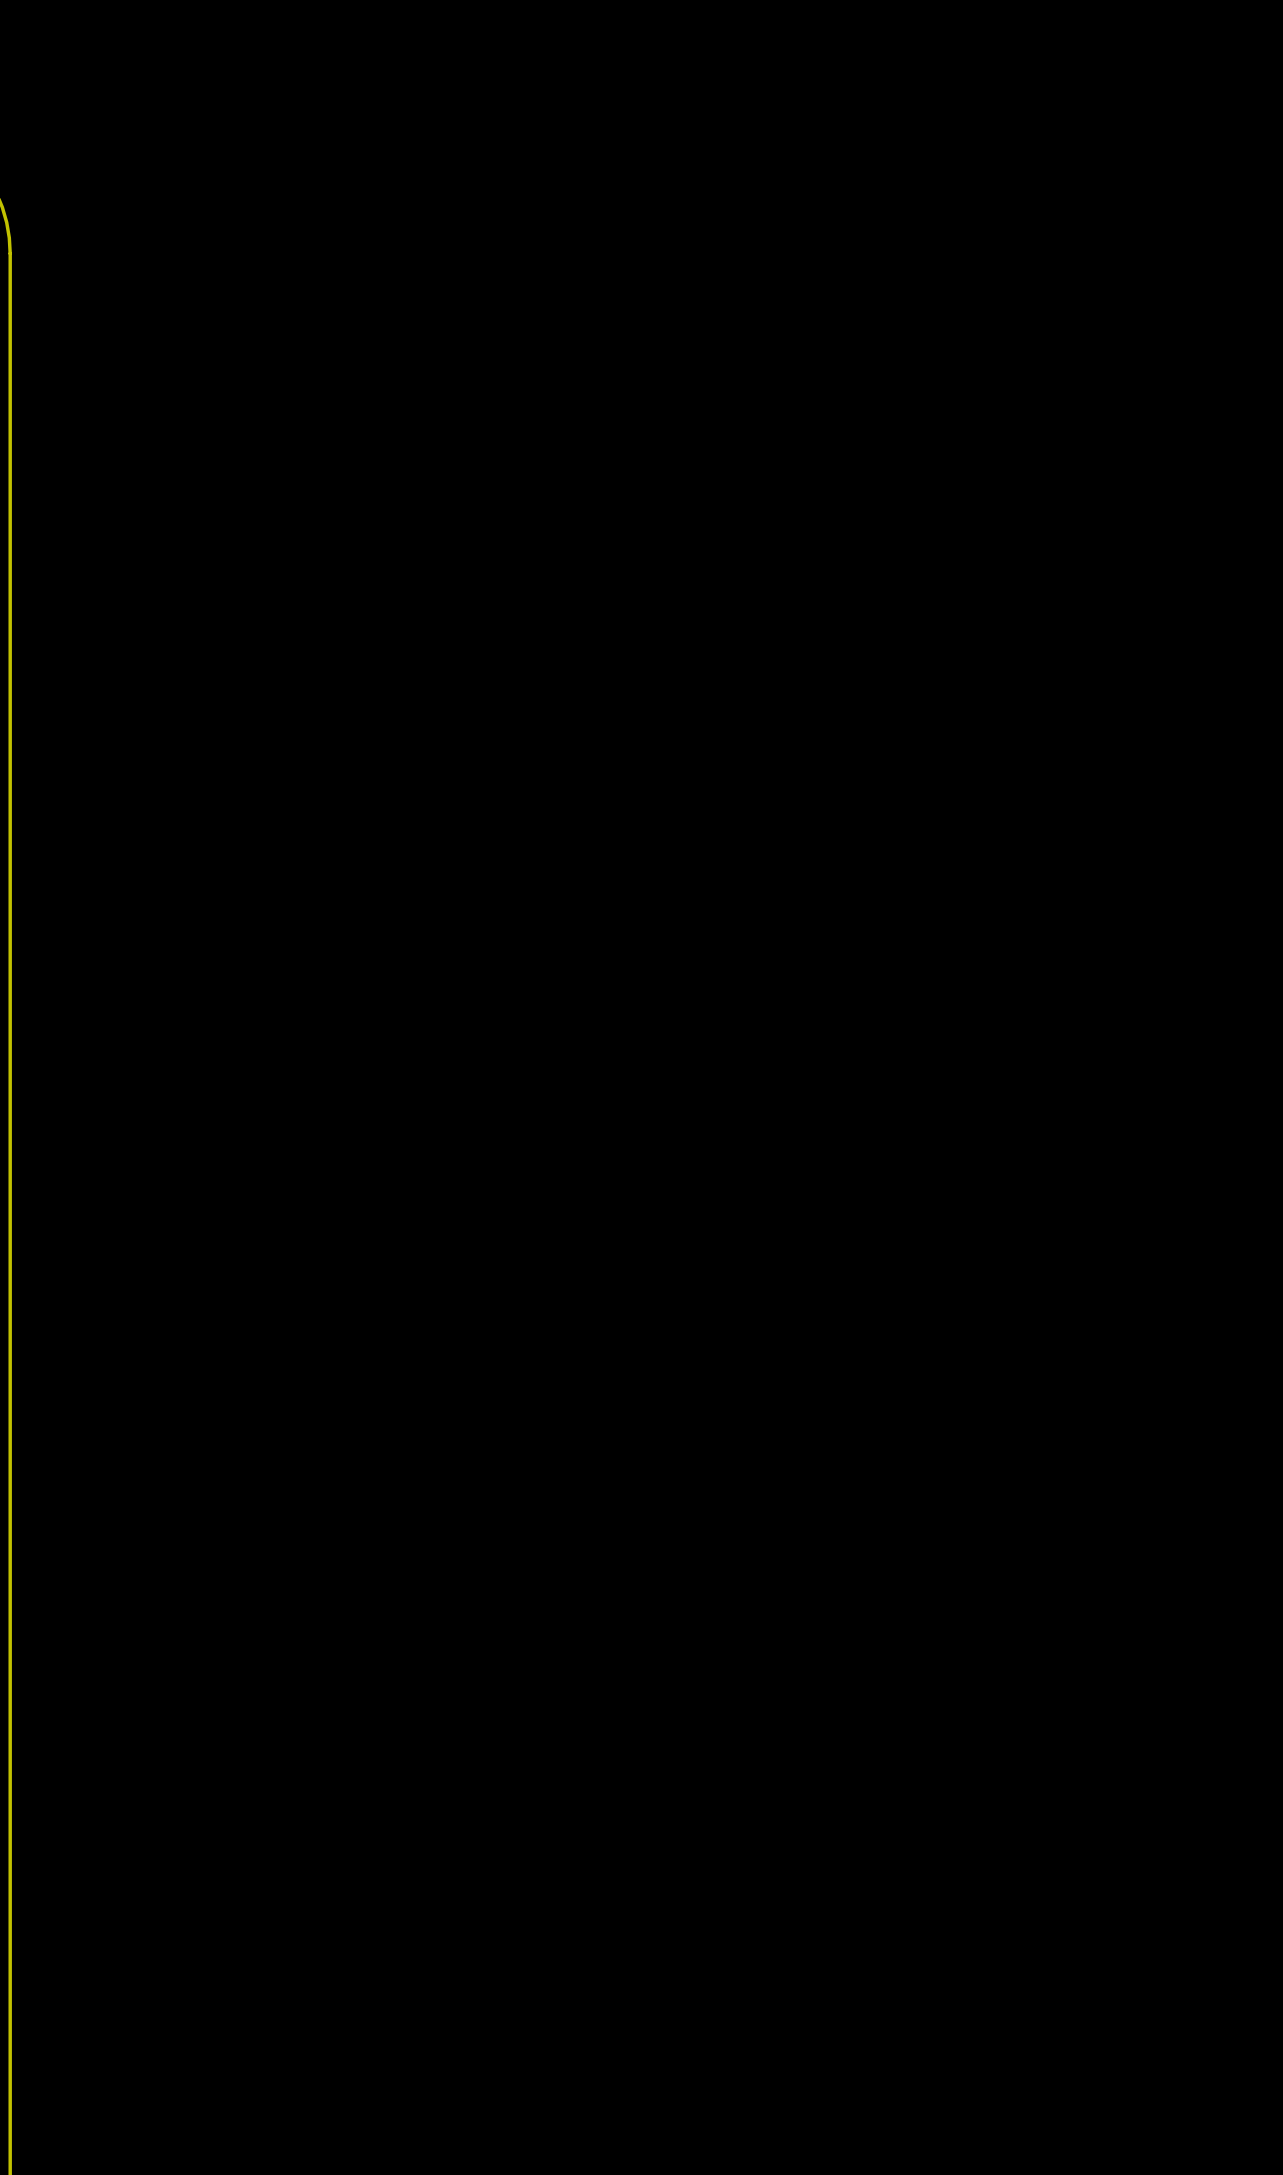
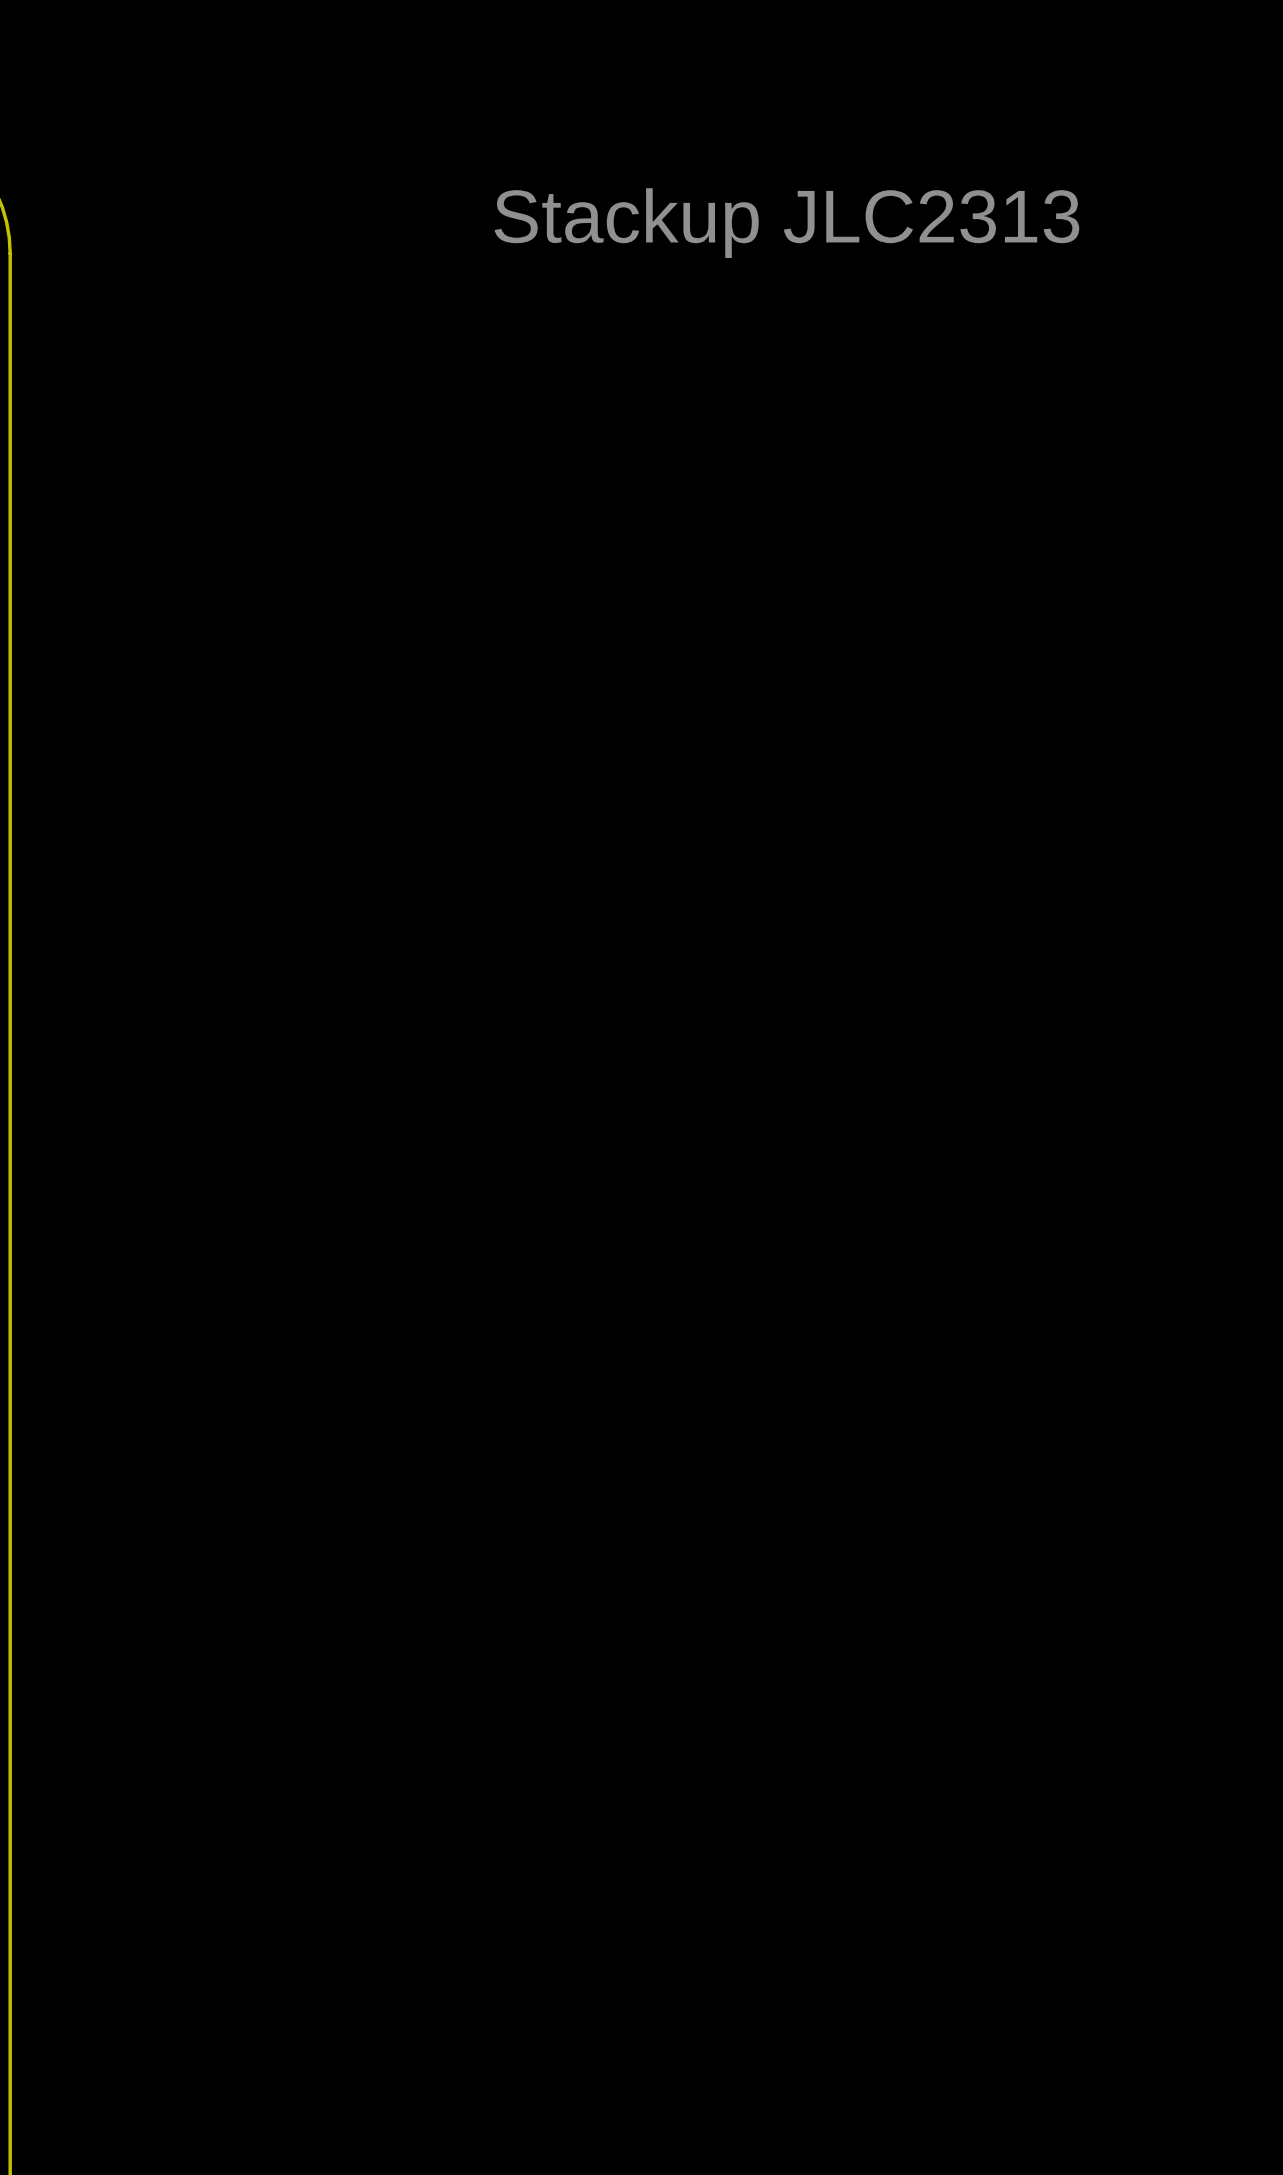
text: none -> Stackup JLC2313 (786, 223)

